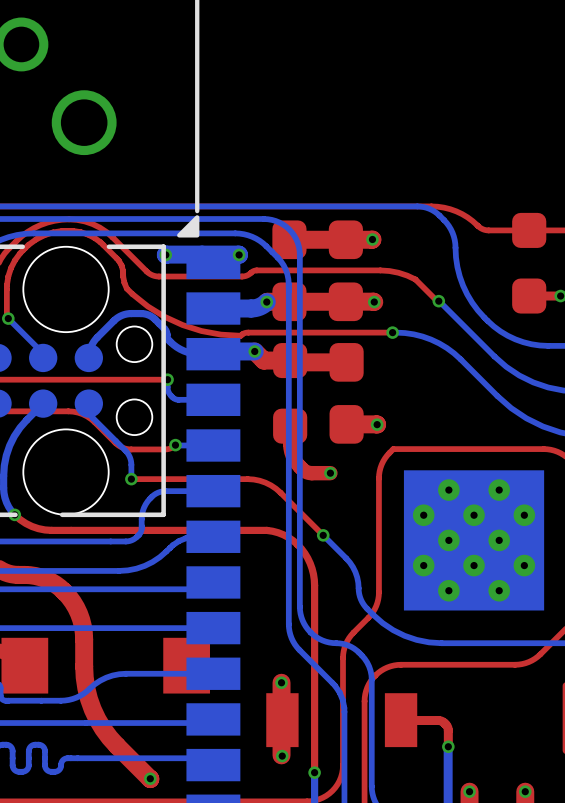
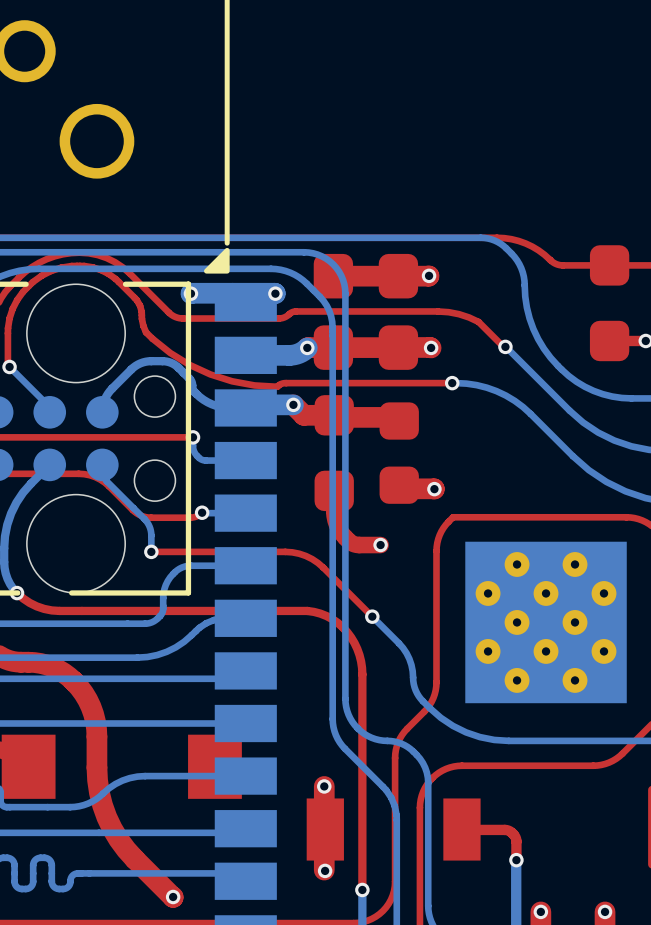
part footprint: [329, 343, 364, 444] -> [379, 402, 419, 504]

